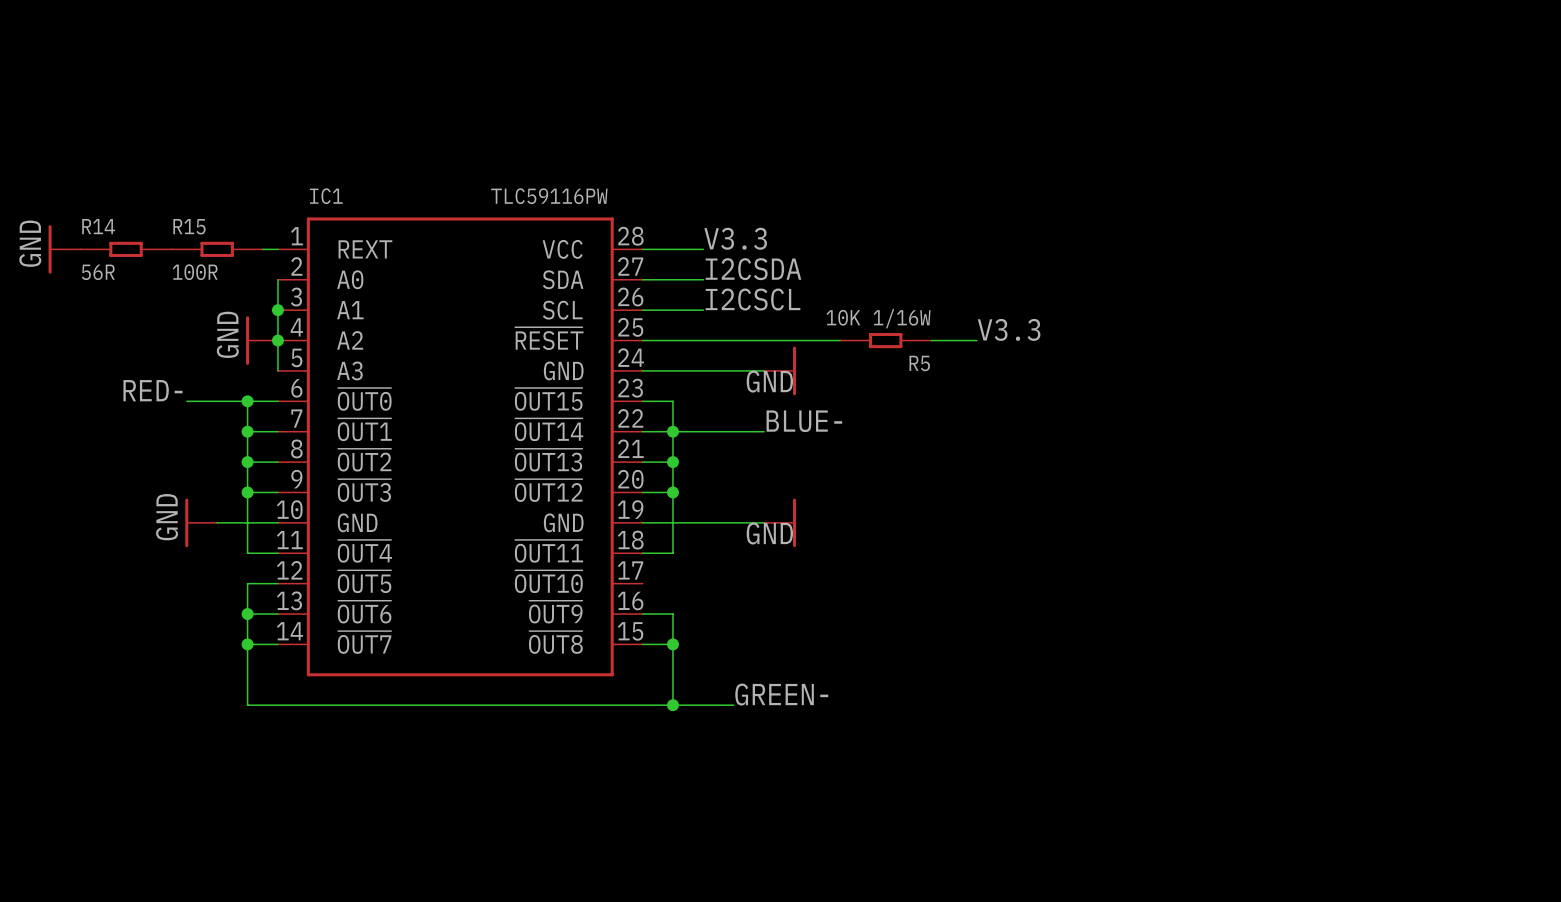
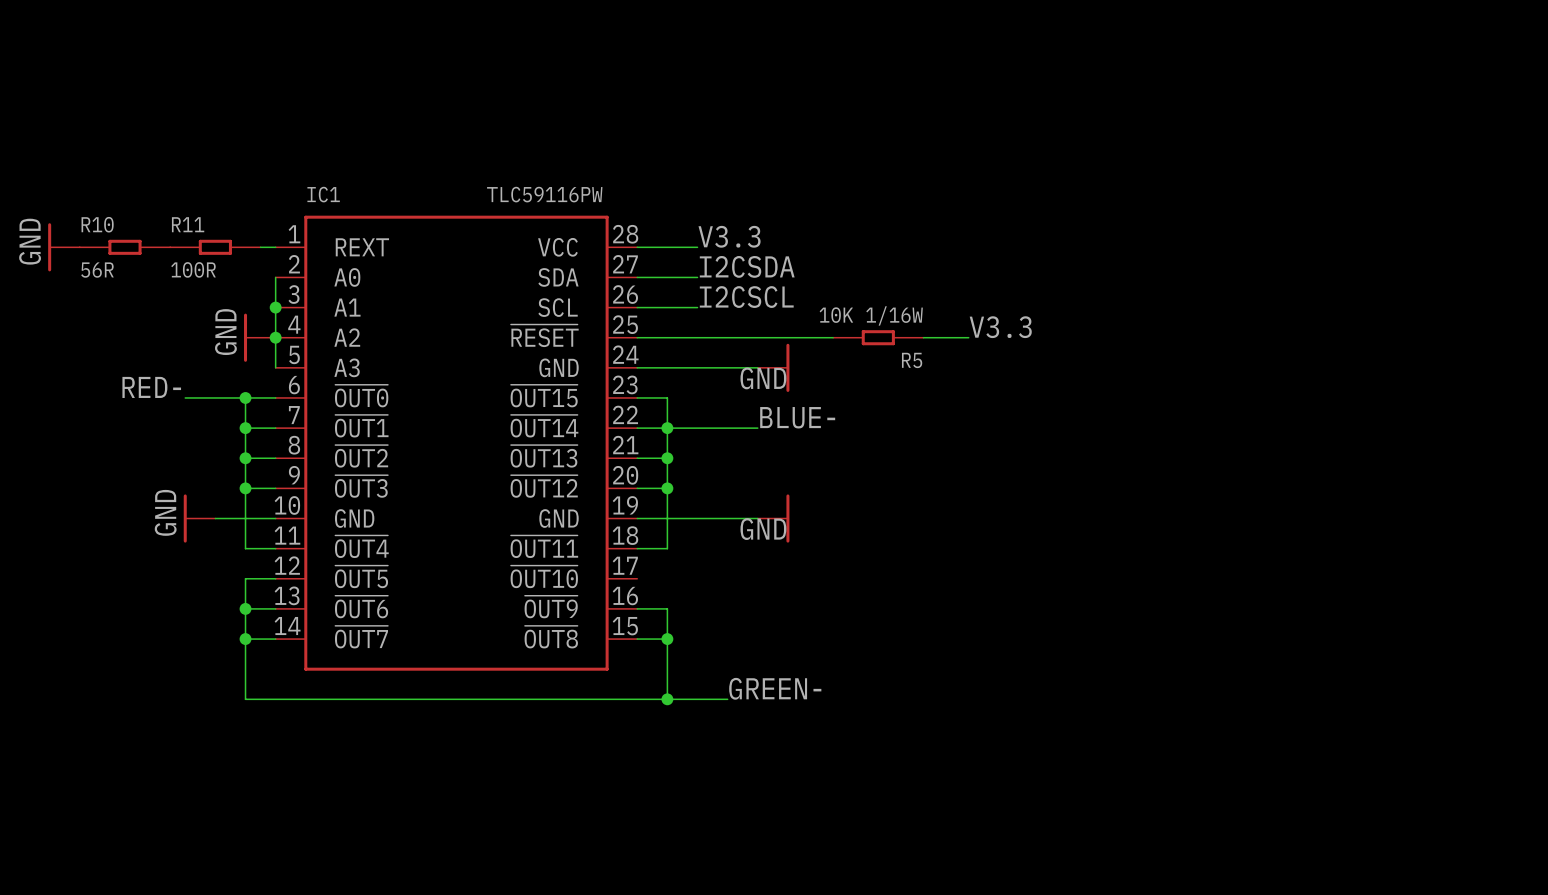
R14 name: R14 (98, 226) -> R10 (97, 224)
R15 name: R15 (189, 226) -> R11 (188, 224)

